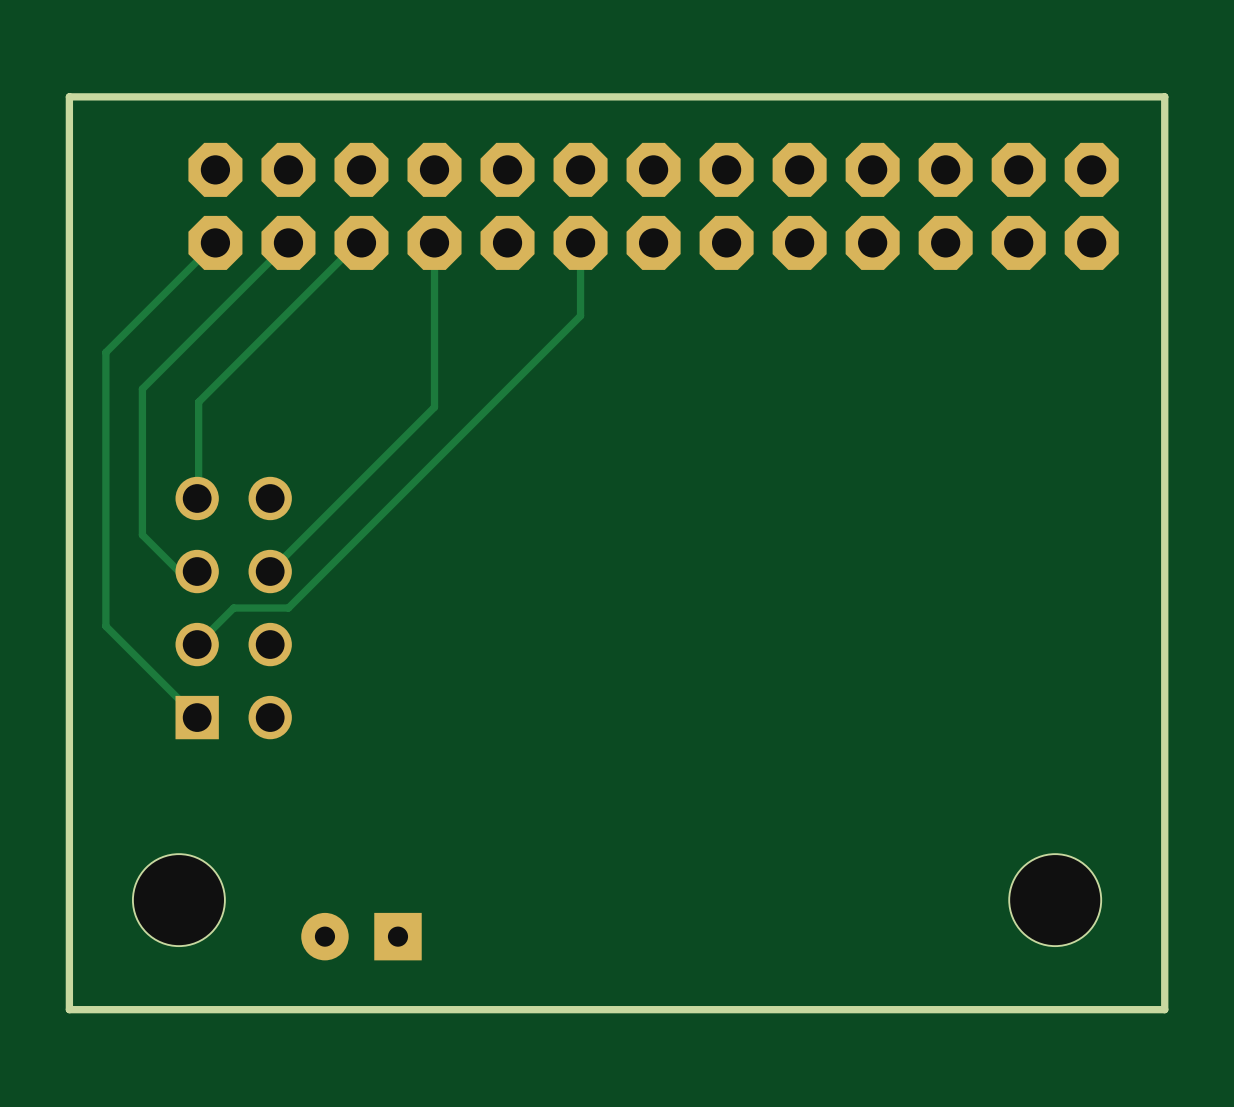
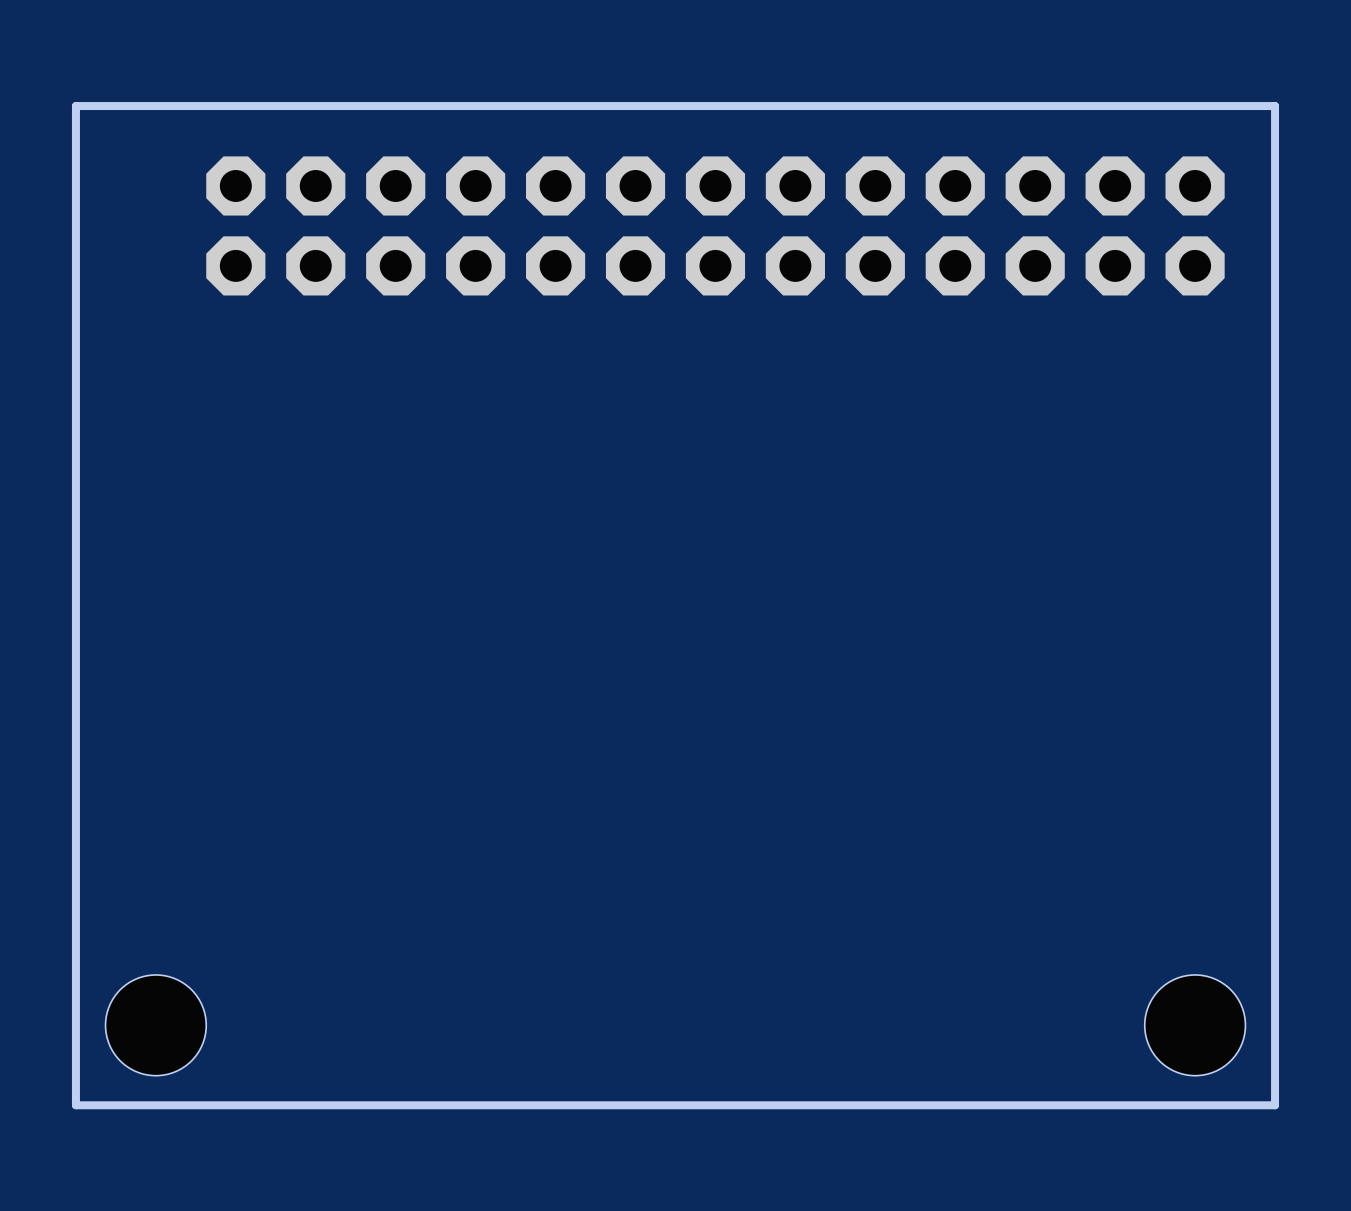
track: (215, 242) (105, 352) (105, 626) (197, 717) -> none
track: (288, 242) (142, 388) (142, 535) (178, 571) (197, 571) -> none
track: (434, 242) (434, 407) (270, 571) -> none
track: (580, 242) (580, 315) (288, 608) (233, 608) (197, 644) -> none
track: (356, 244) (198, 402) (197, 498) -> none
part: (233, 608) -> none
hole position: (178, 900) -> (155, 1025)
hole position: (1055, 900) -> (1195, 1025)
part: (361, 936) -> none

